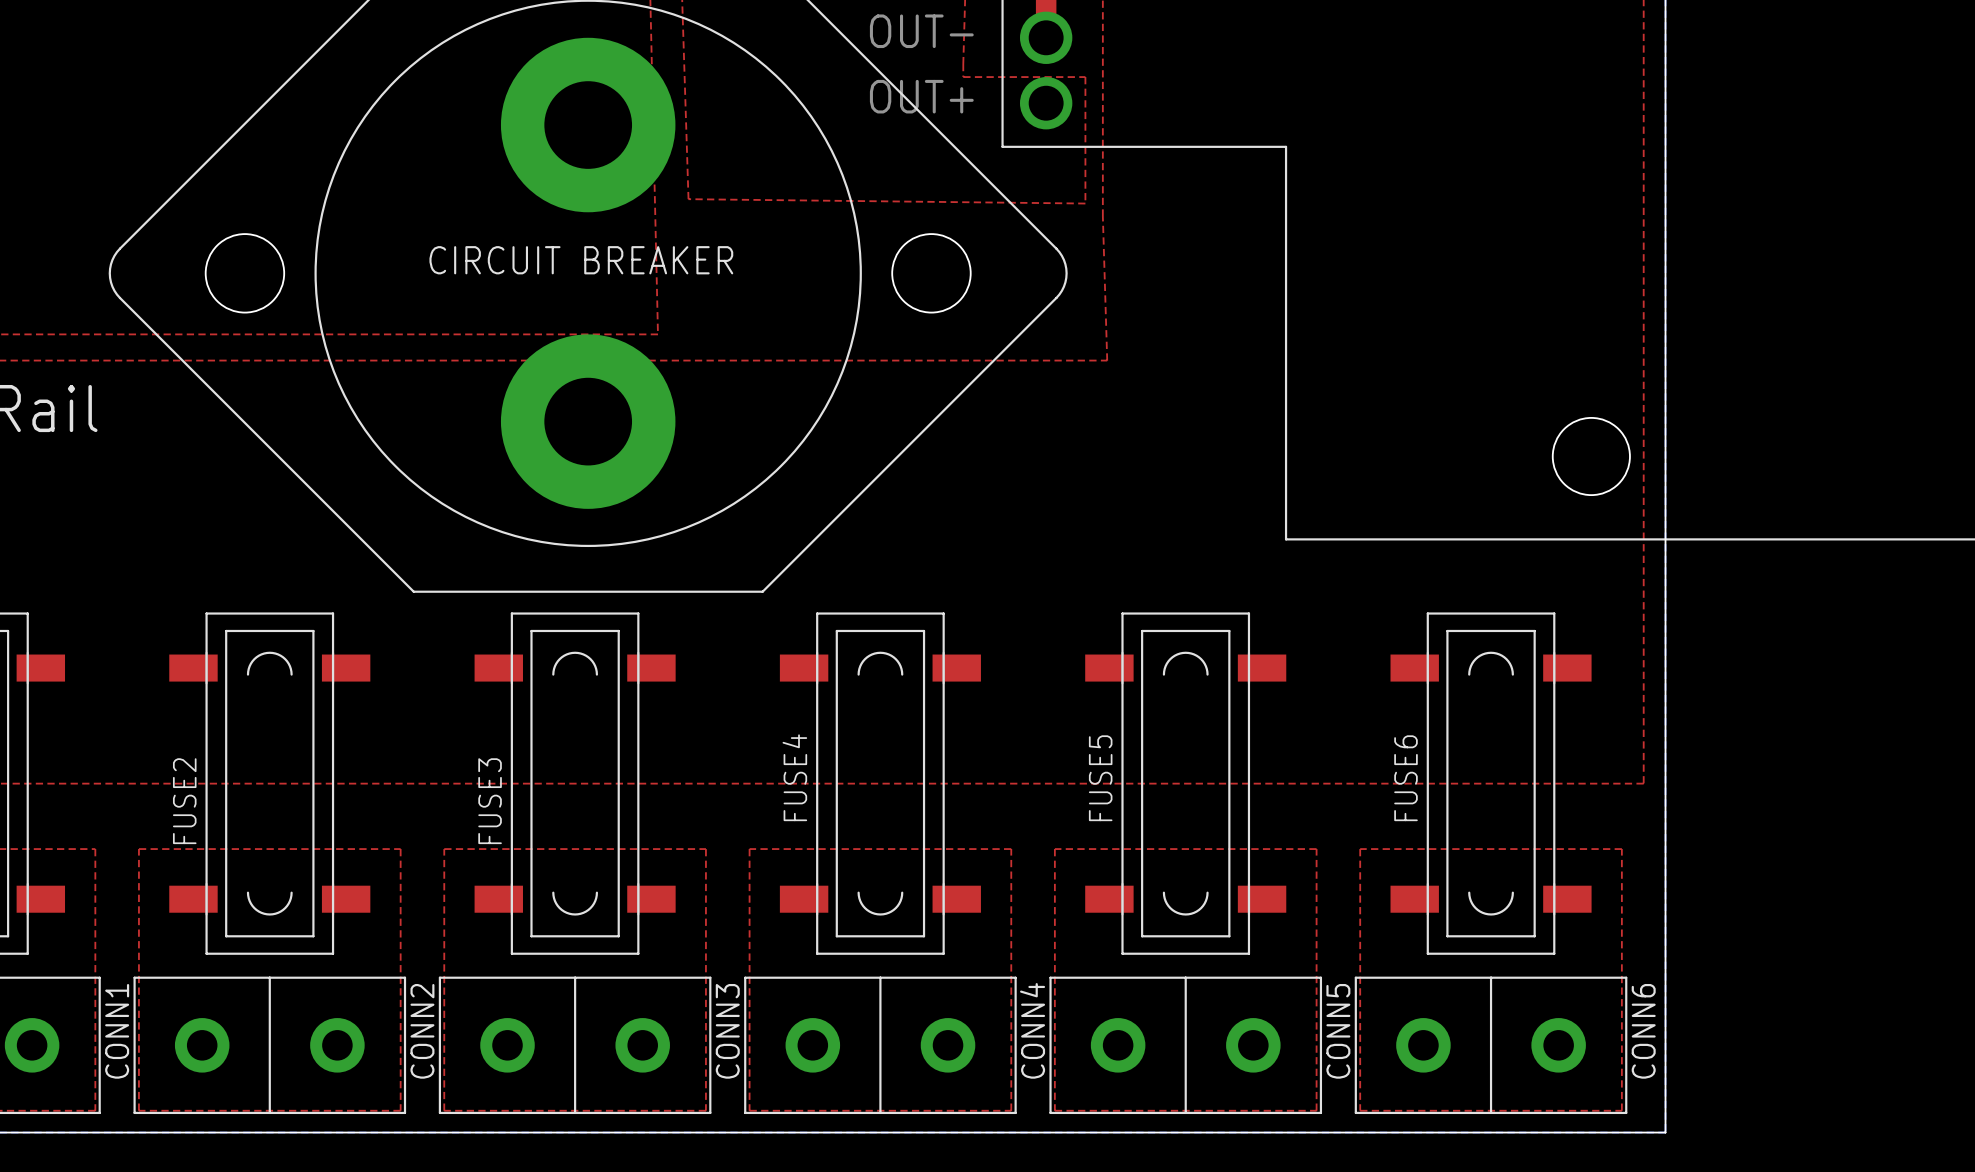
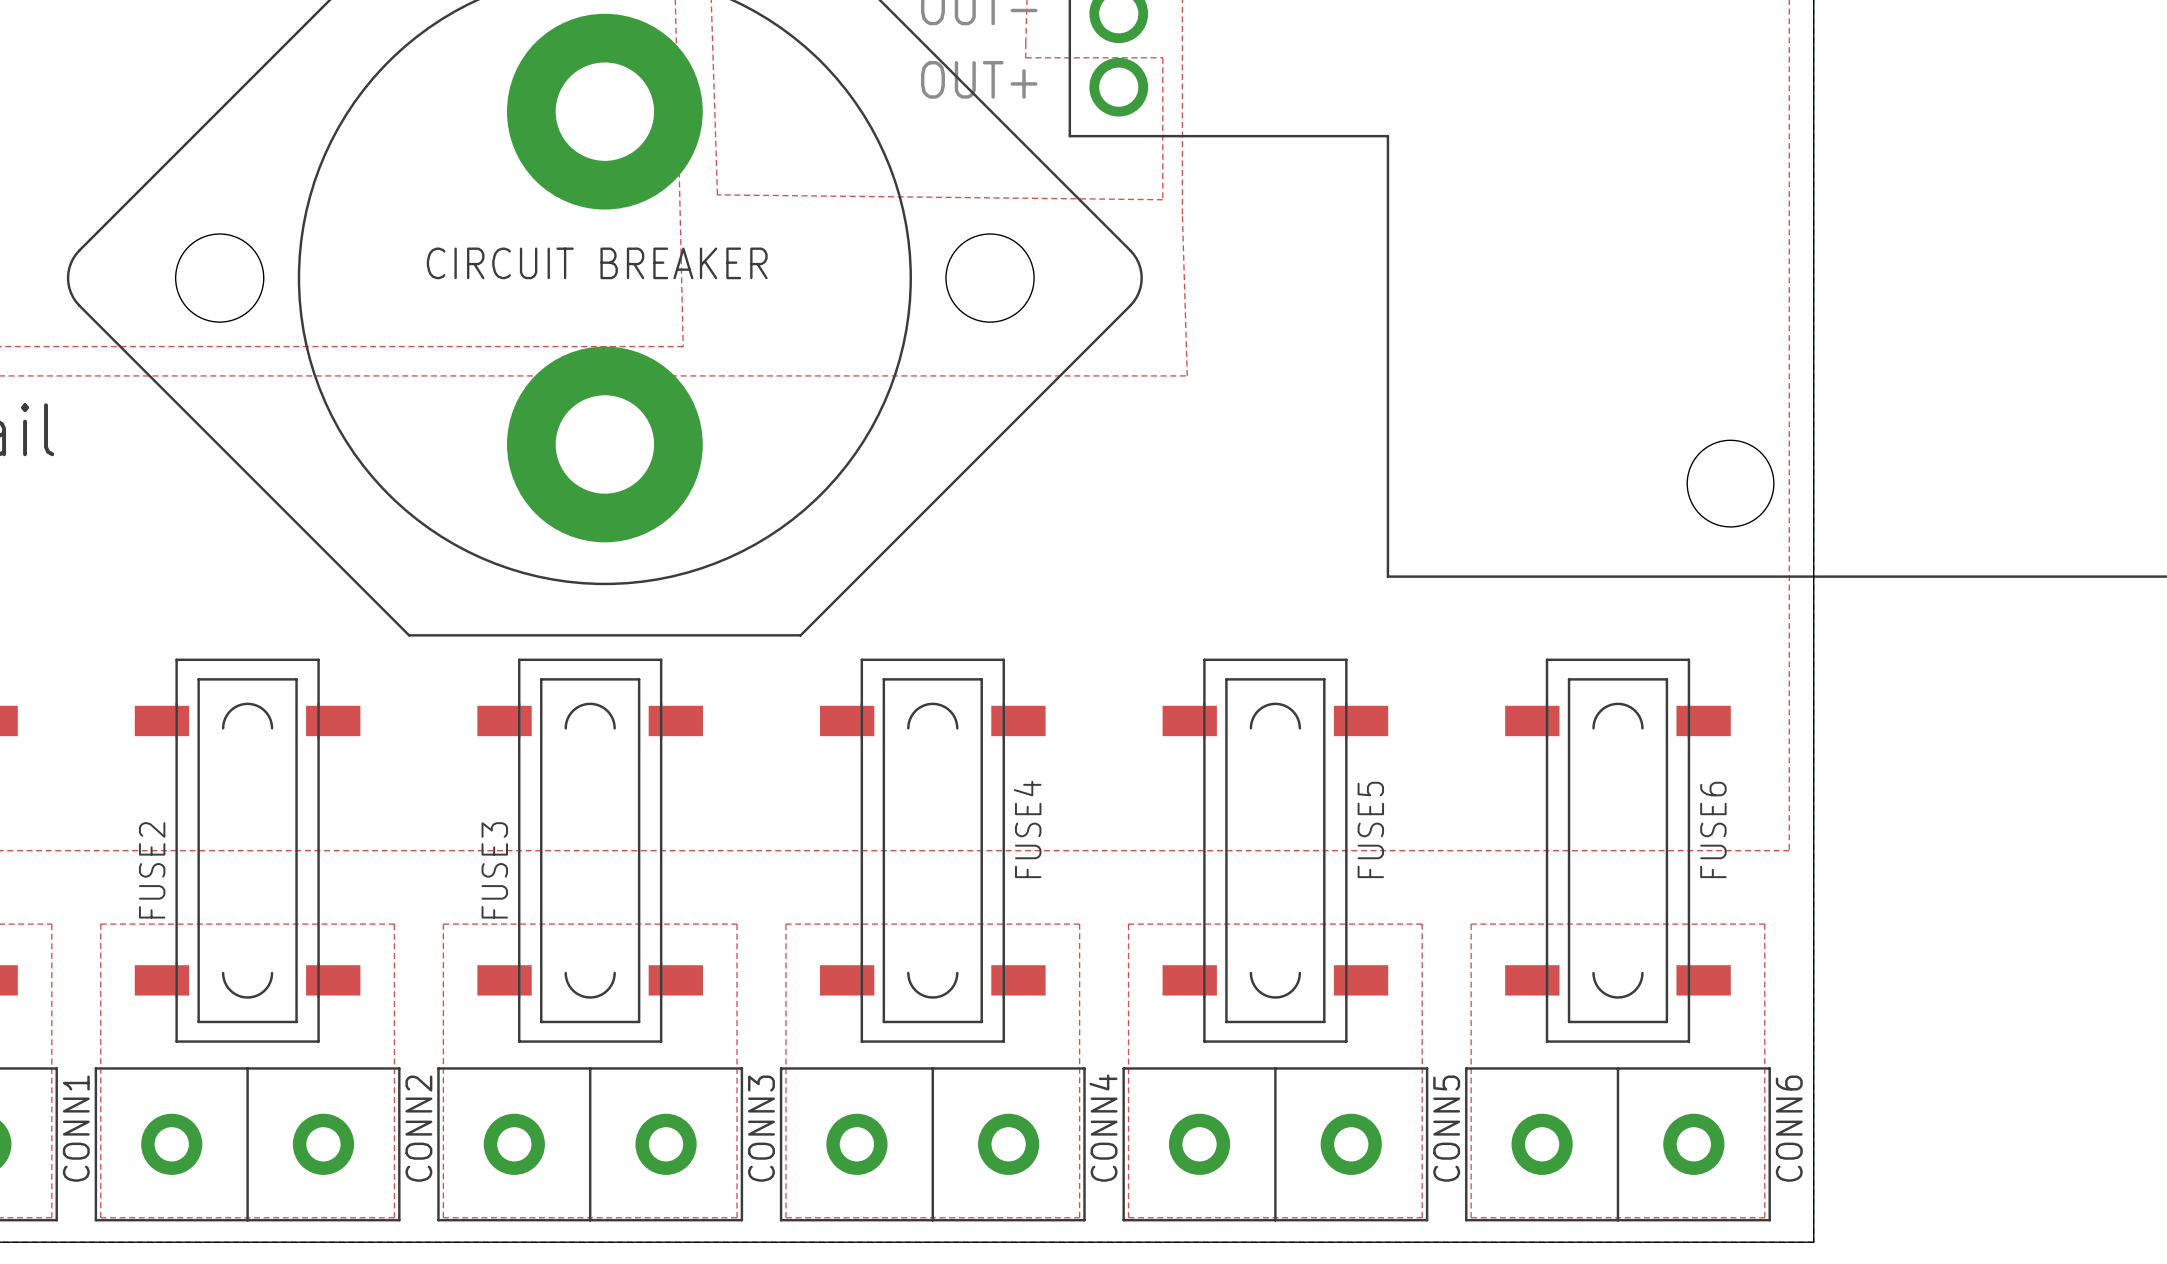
FUSE4 name position: FUSE4 (794, 777) -> FUSE4 (1027, 829)
FUSE5 name position: FUSE5 (1100, 778) -> FUSE5 (1370, 829)
FUSE6 name position: FUSE6 (1405, 778) -> FUSE6 (1713, 829)

